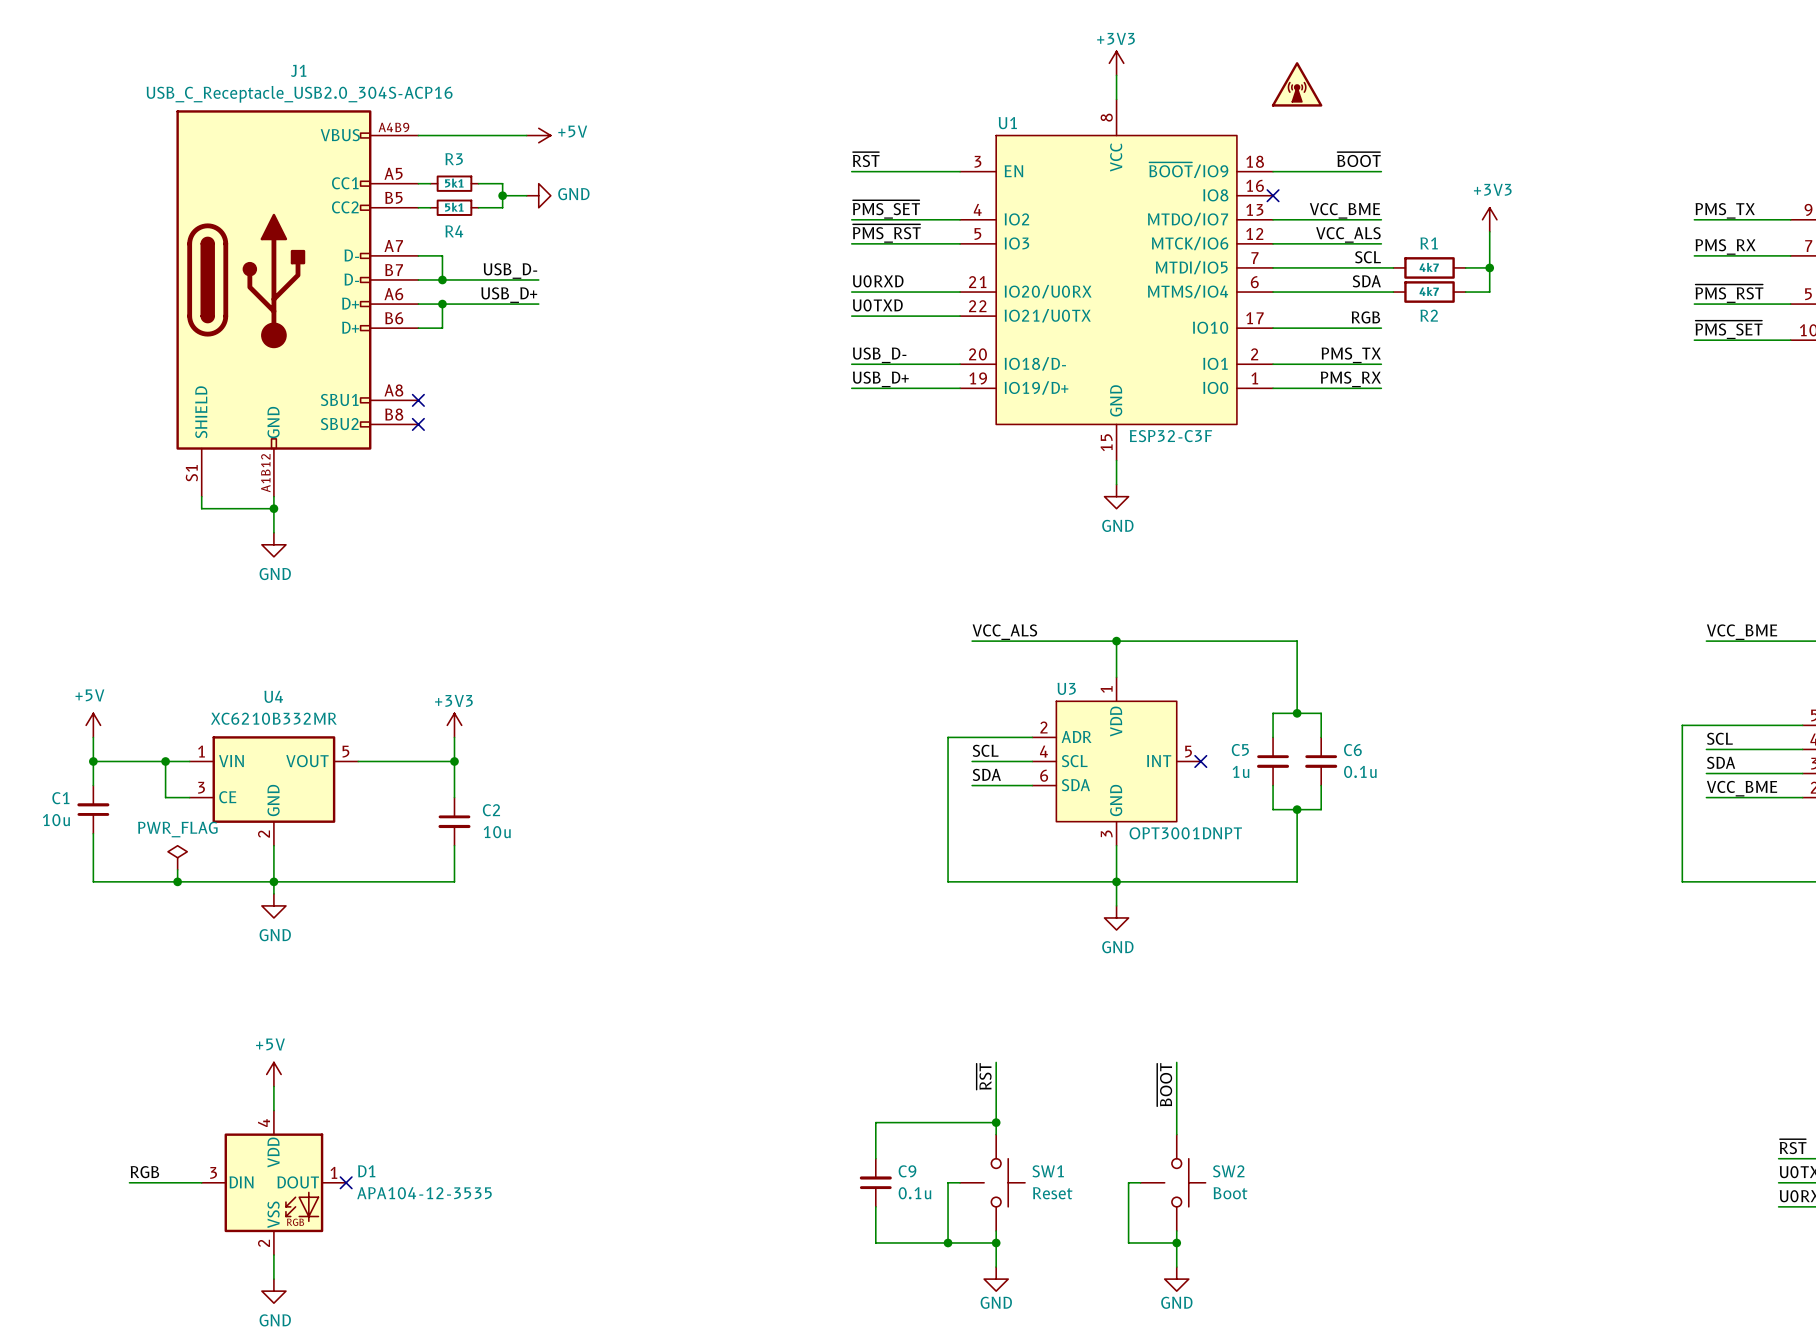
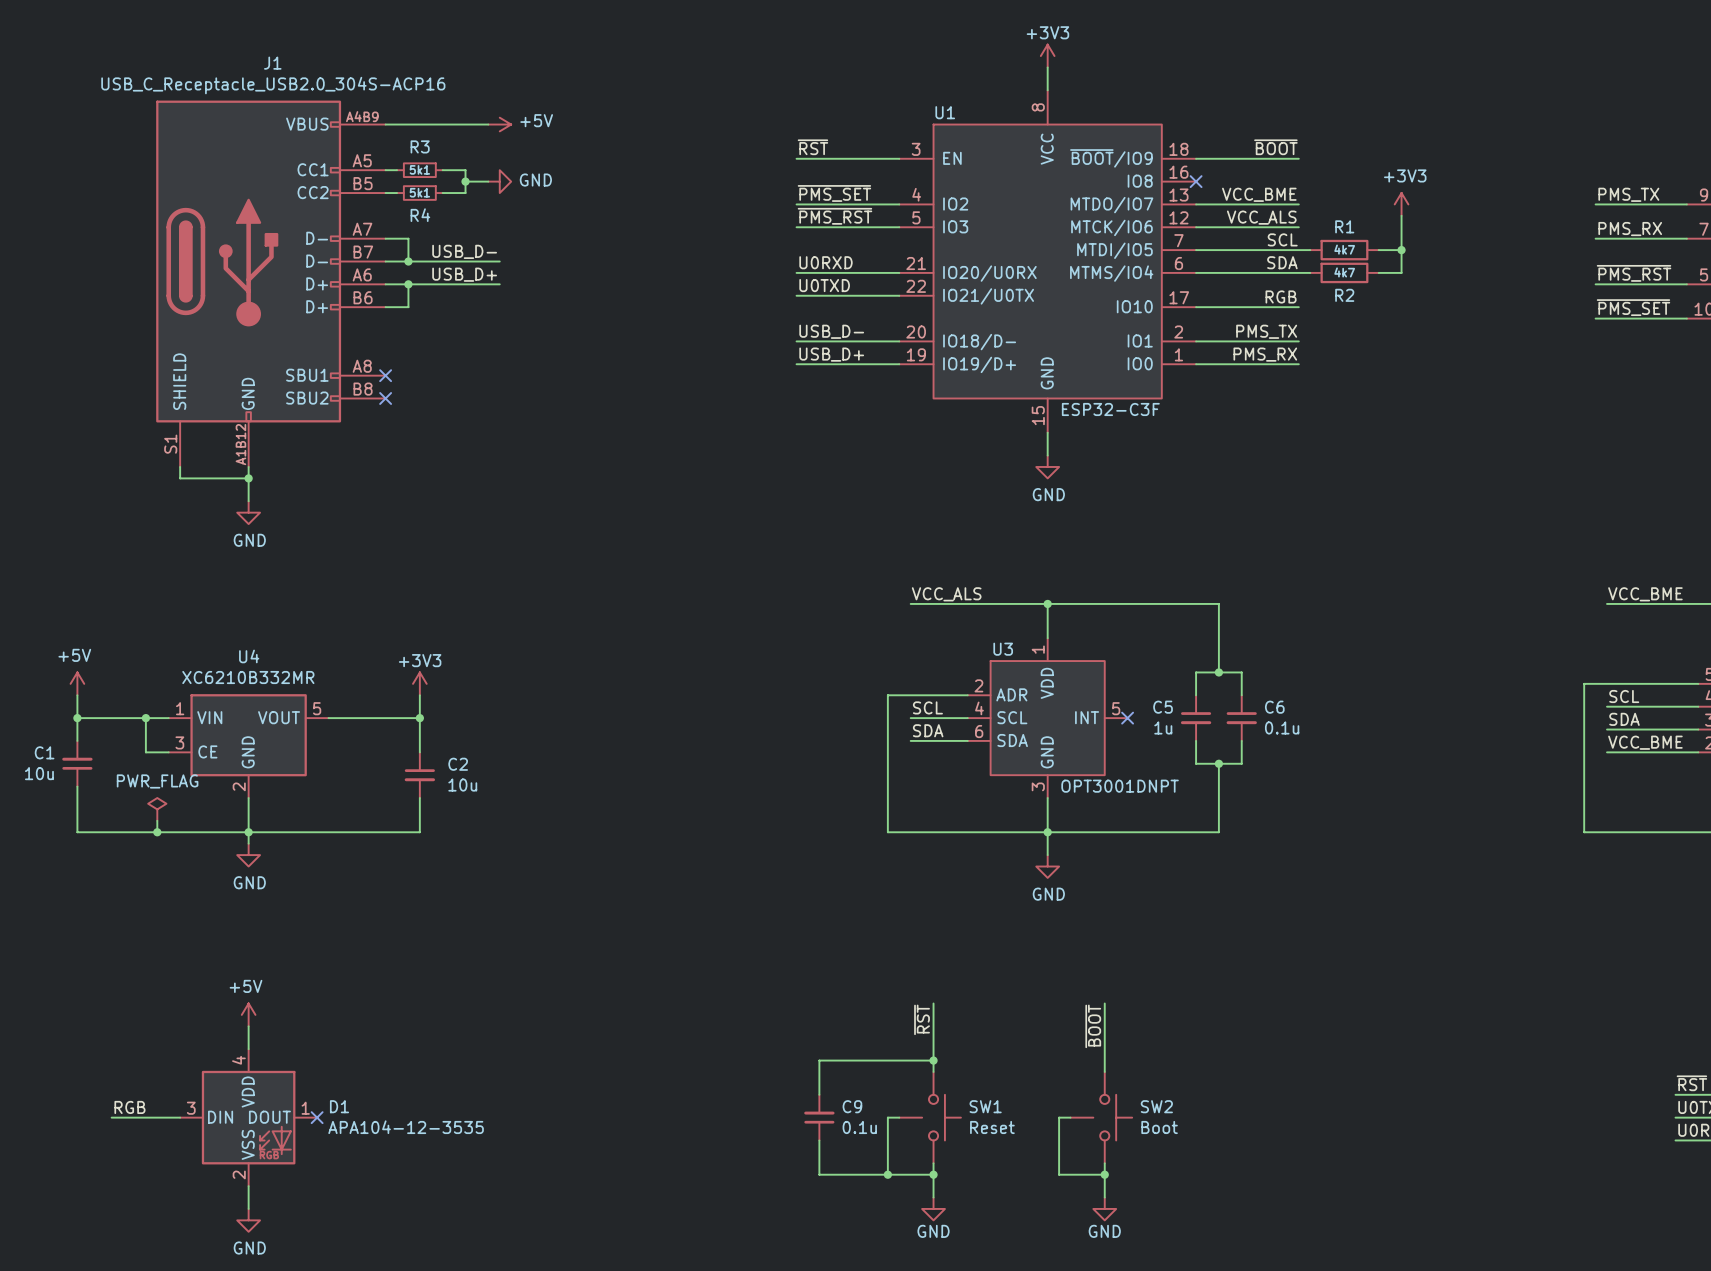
part: (1297, 84) -> none

